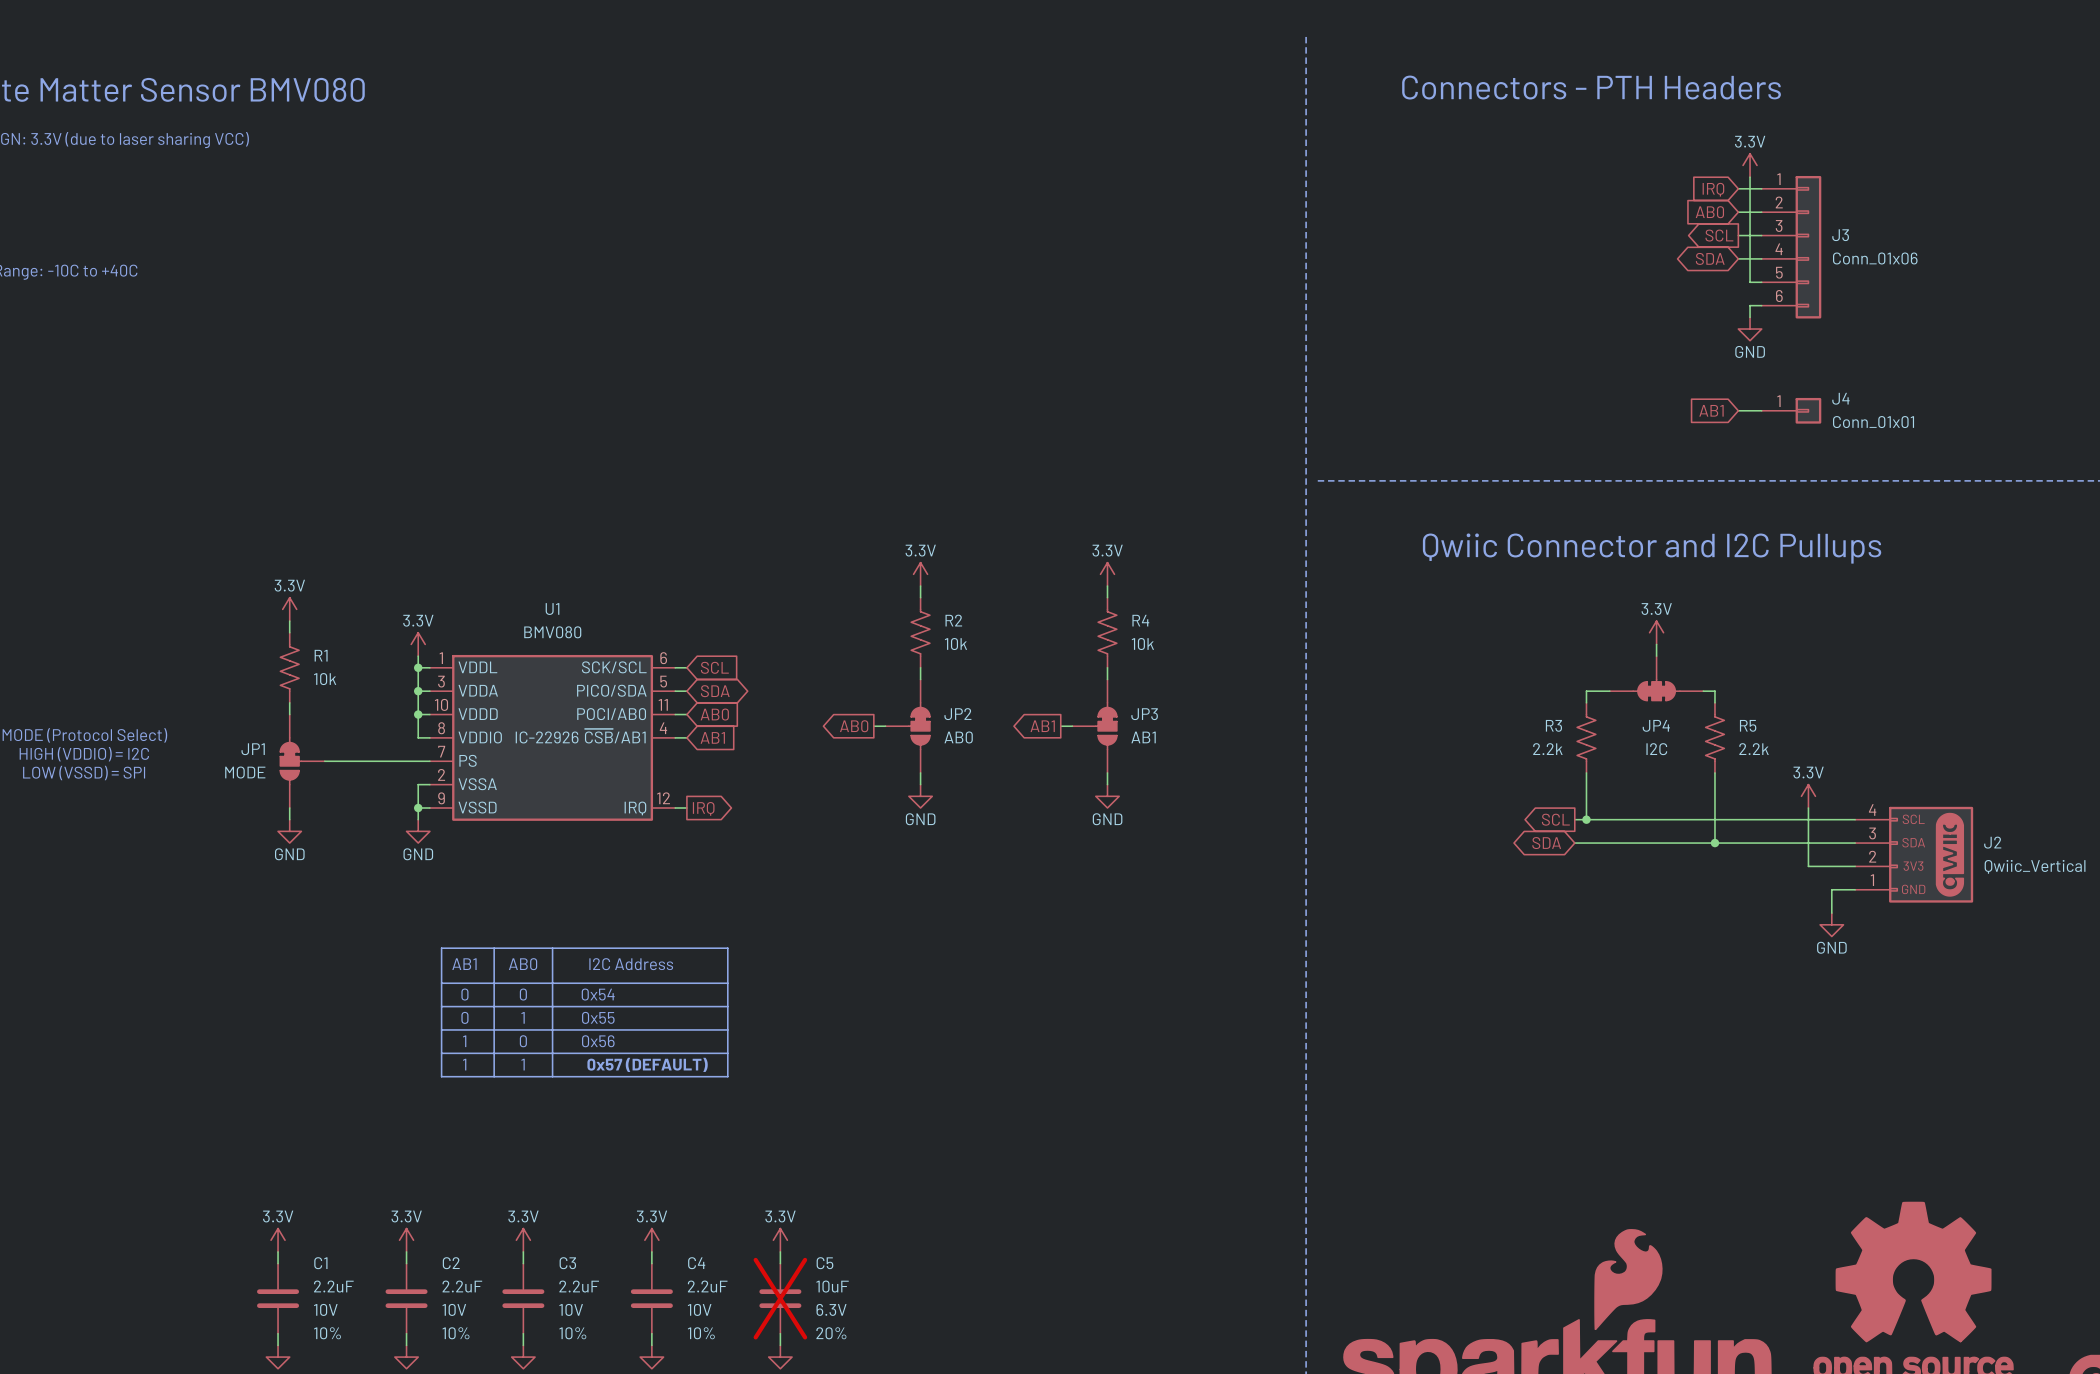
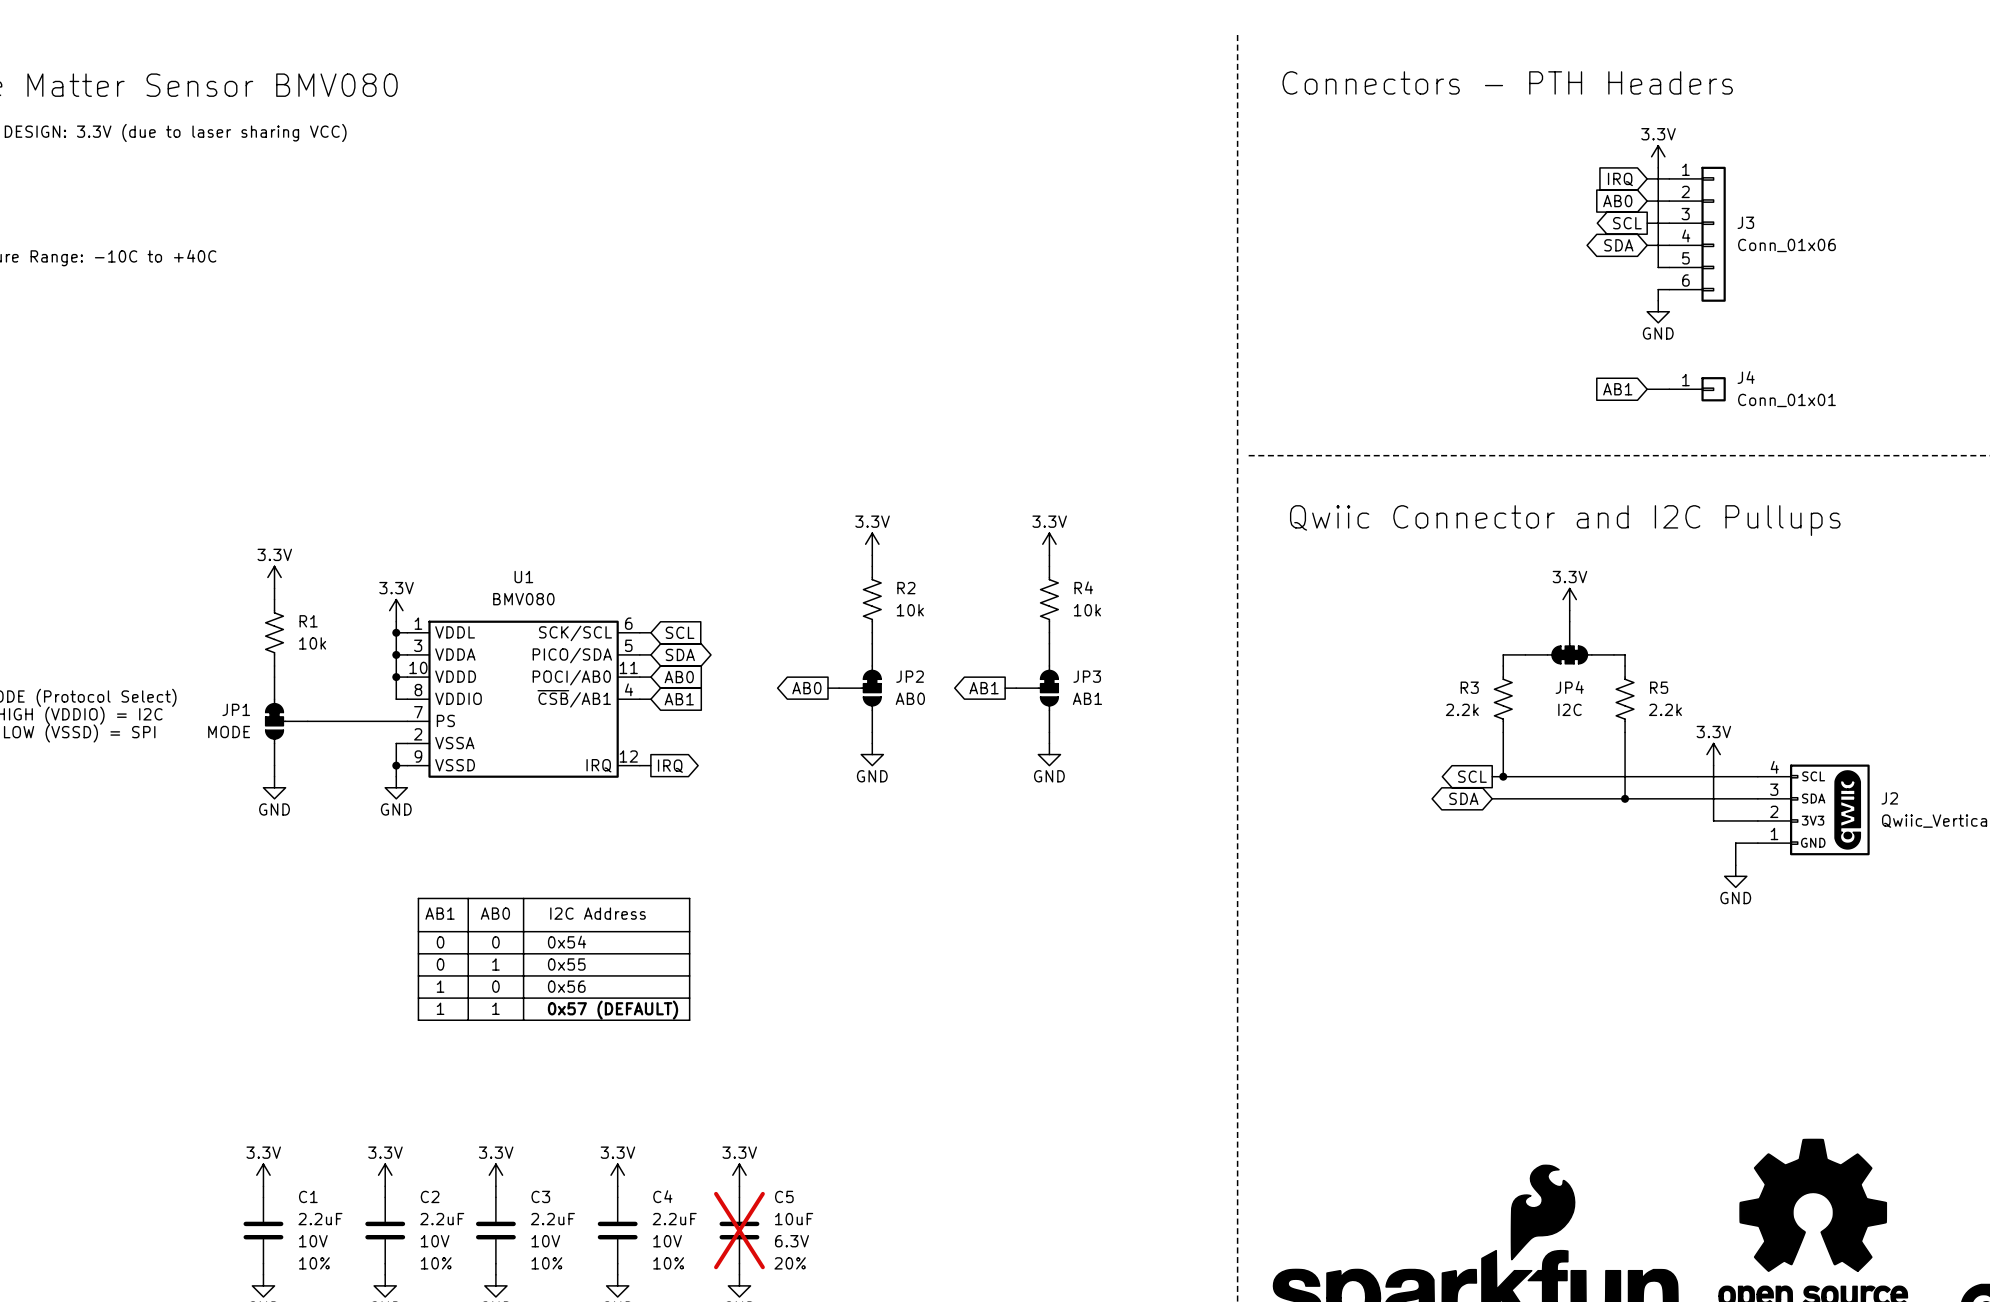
U1 text: IC-22926 (547, 737) -> none

